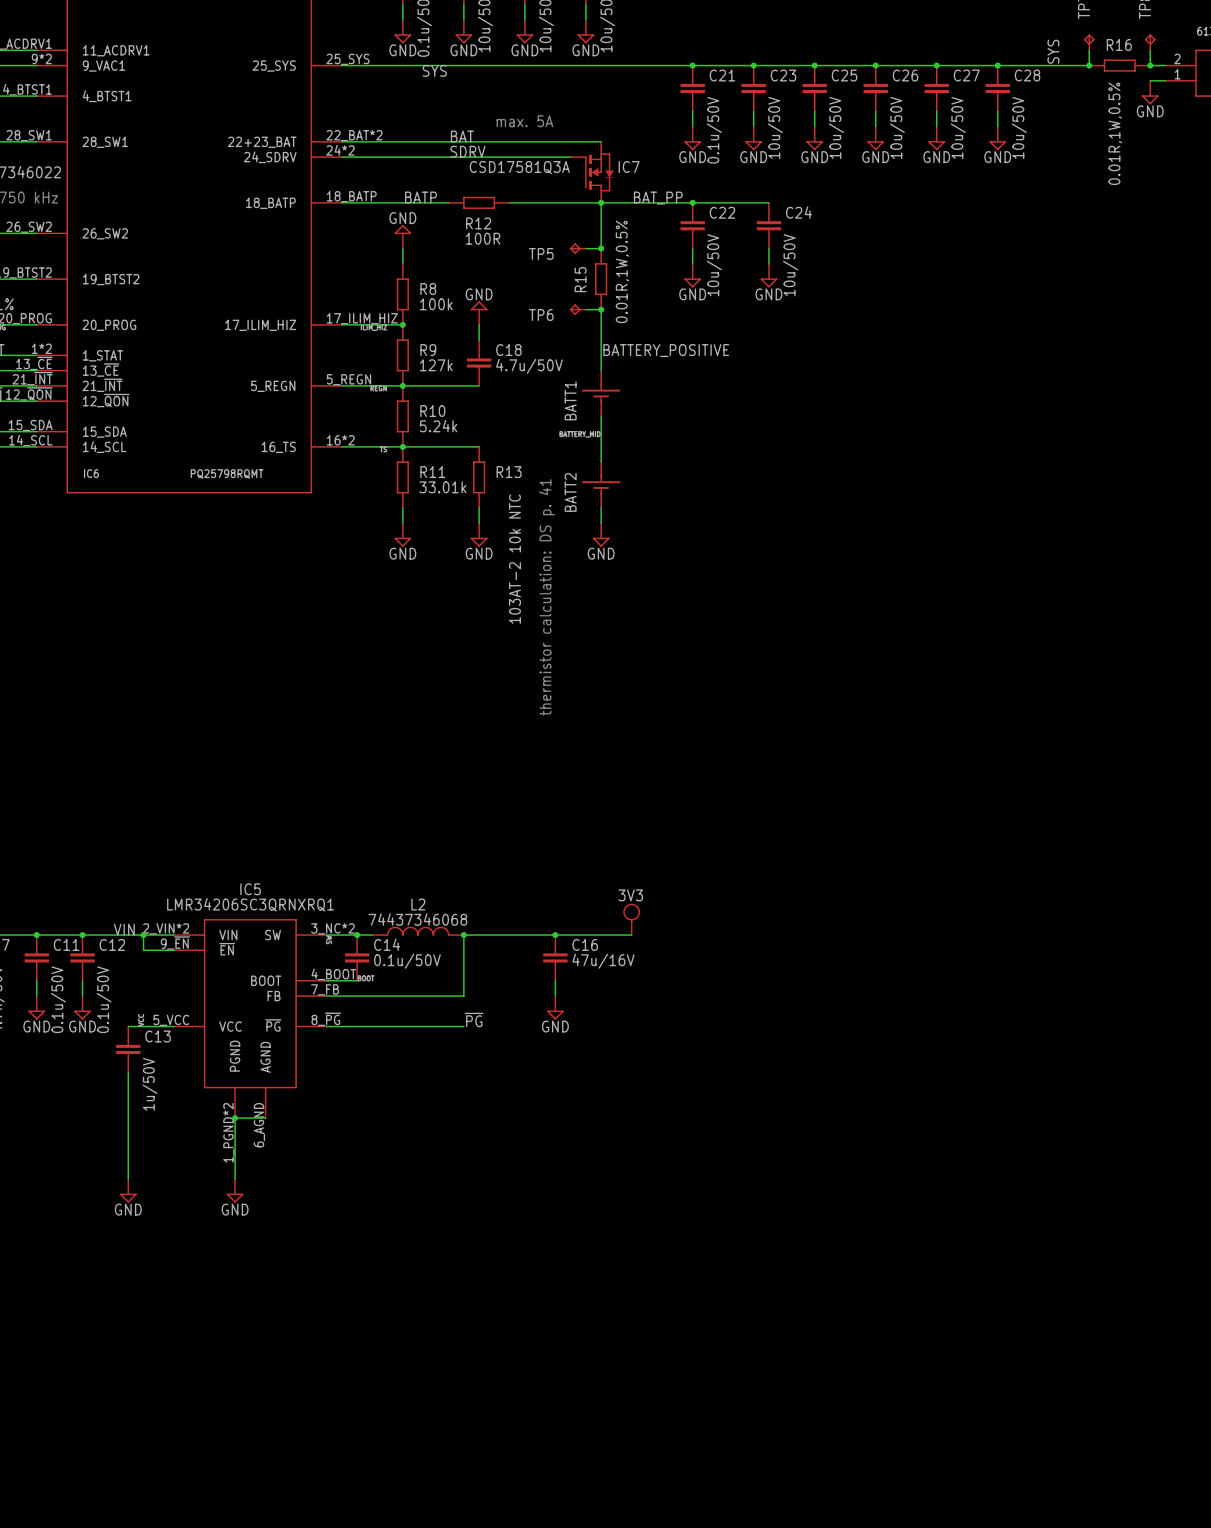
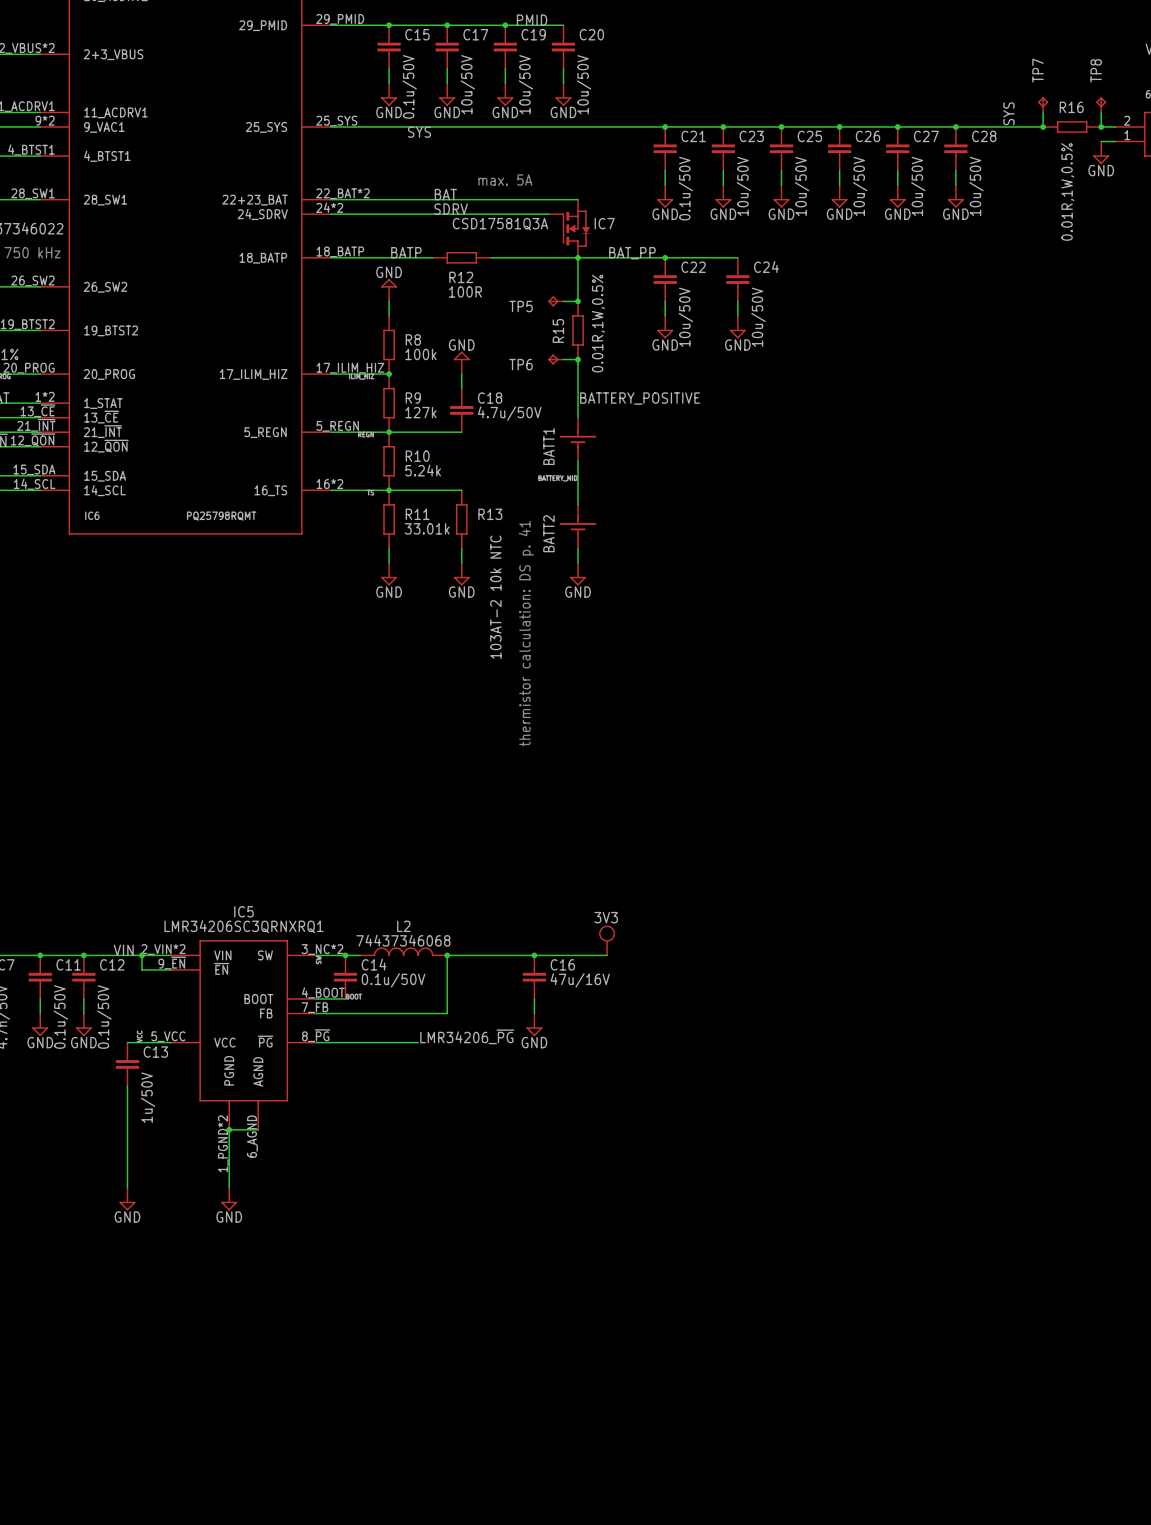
label: ~{PG} (474, 1019) -> none
label: none -> LMR34206_~{PG} (467, 1036)
wire: (433, 1026) (463, 1026) -> none

